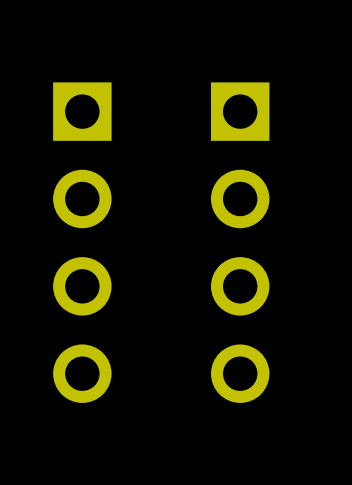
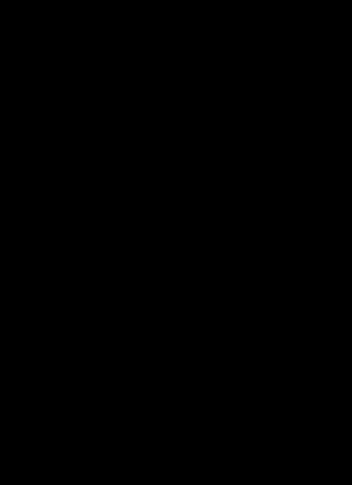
part: (82, 242) -> none
part: (240, 242) -> none

